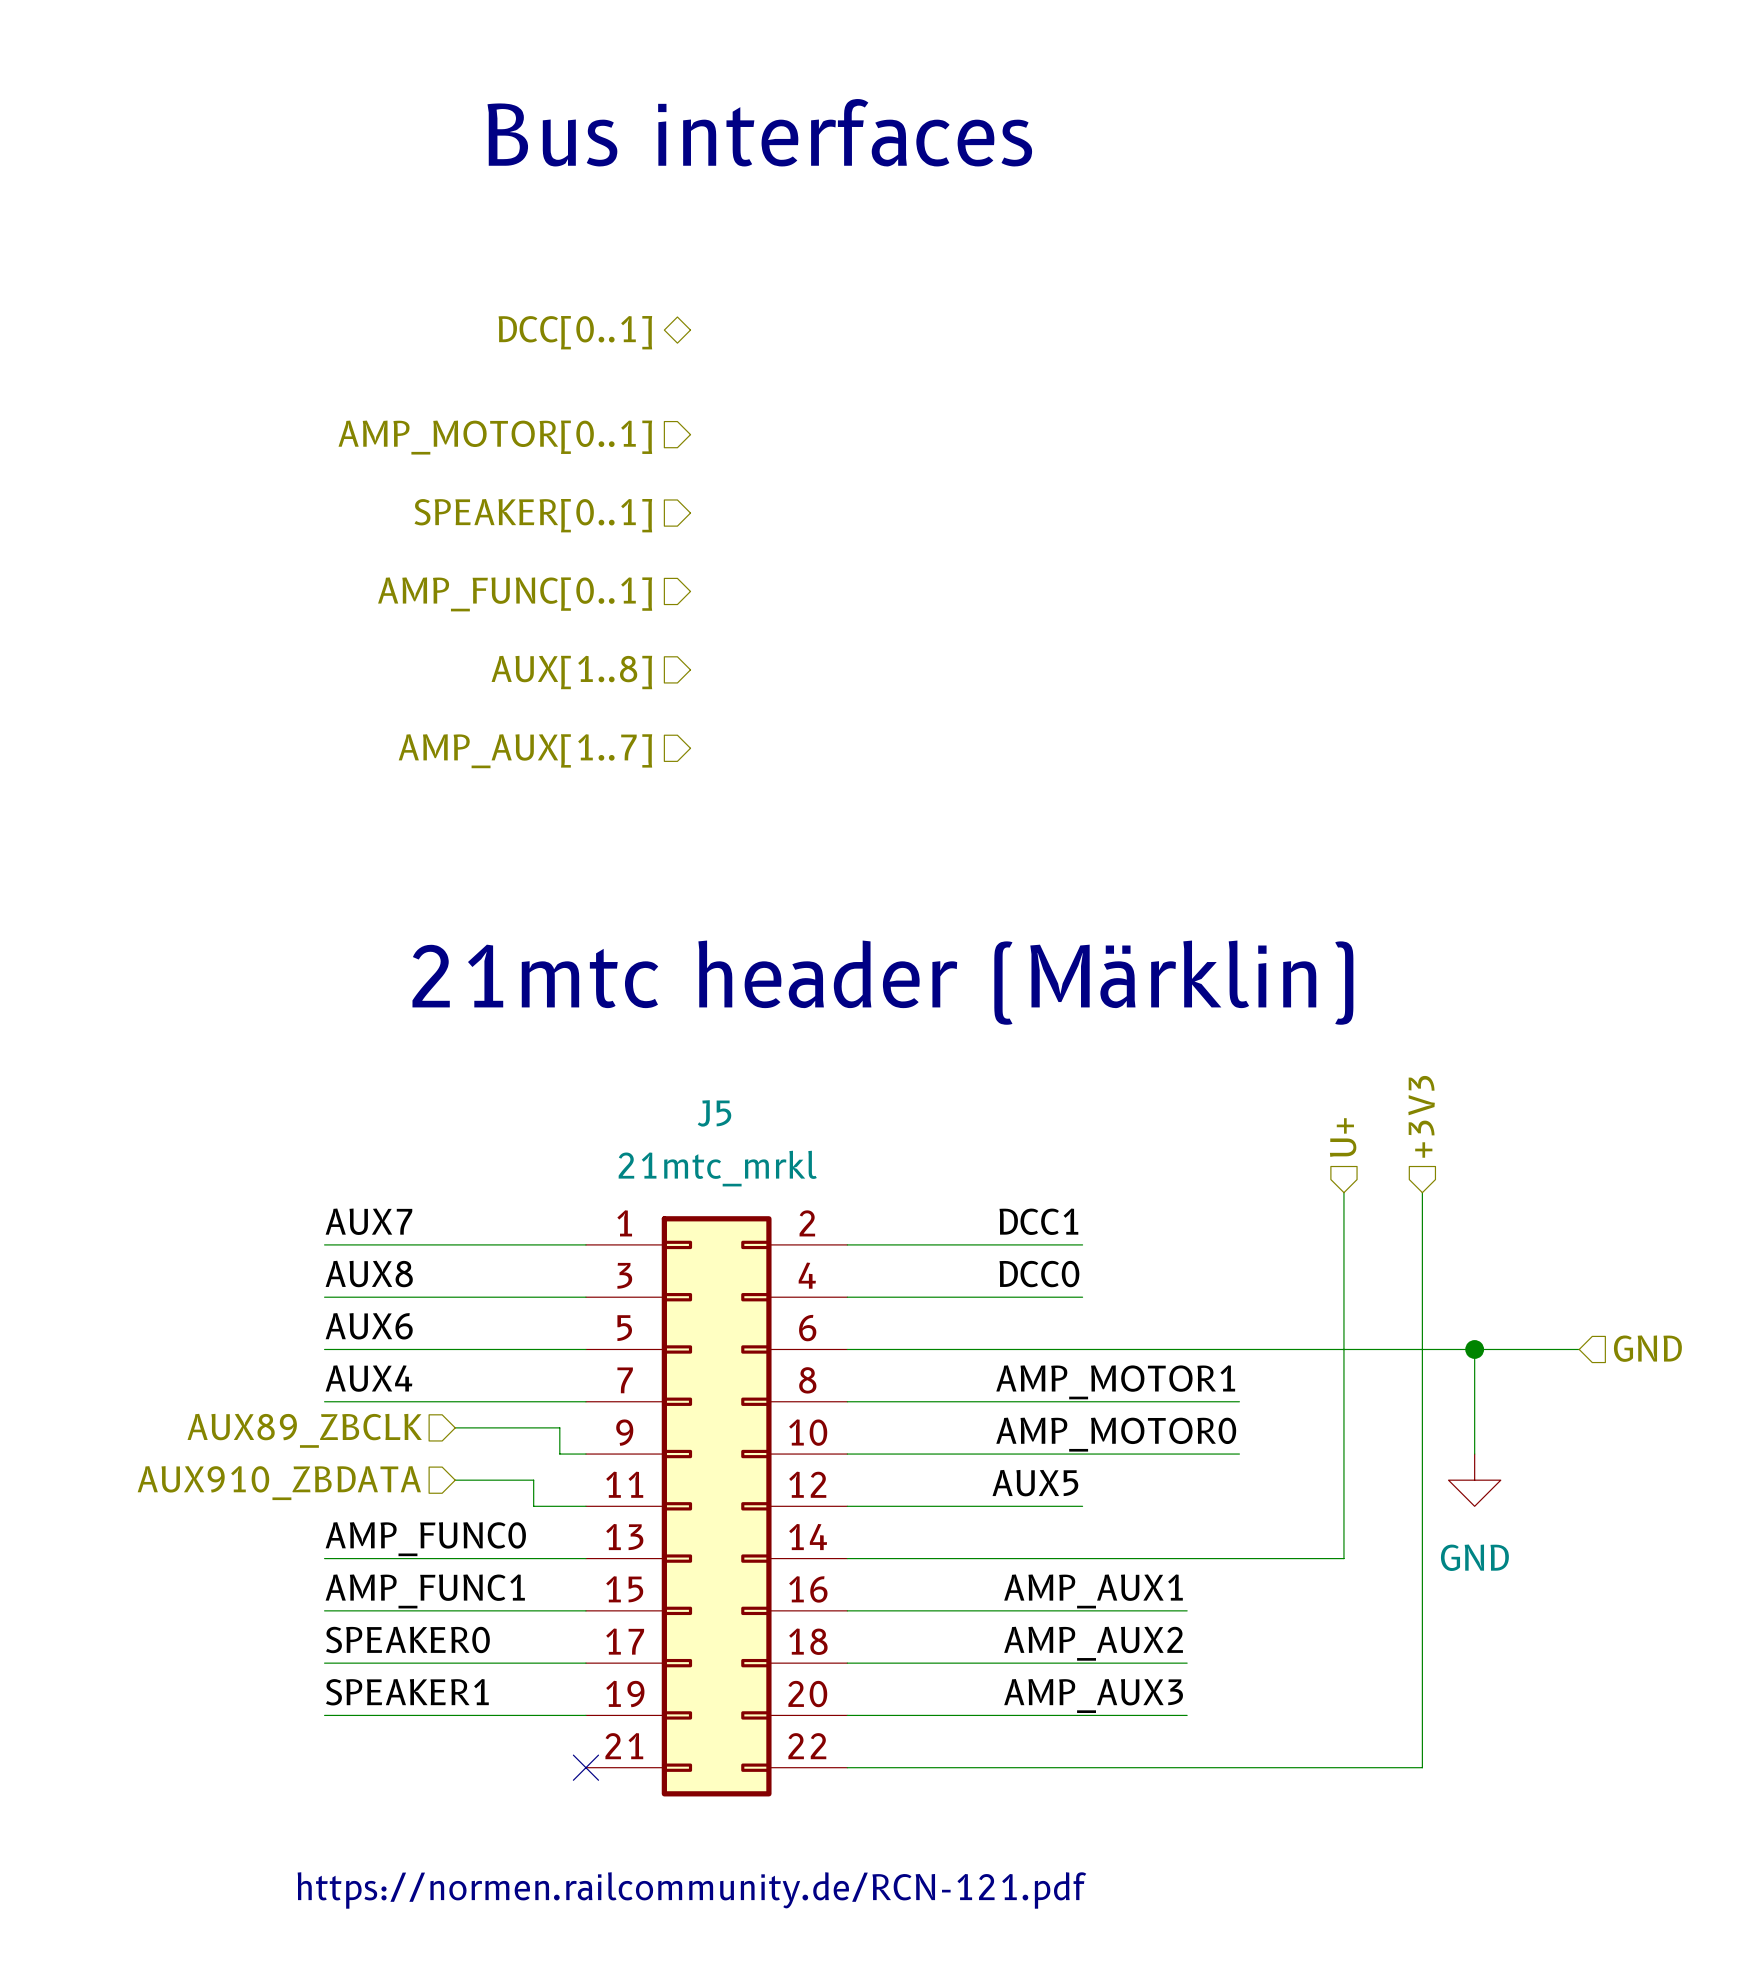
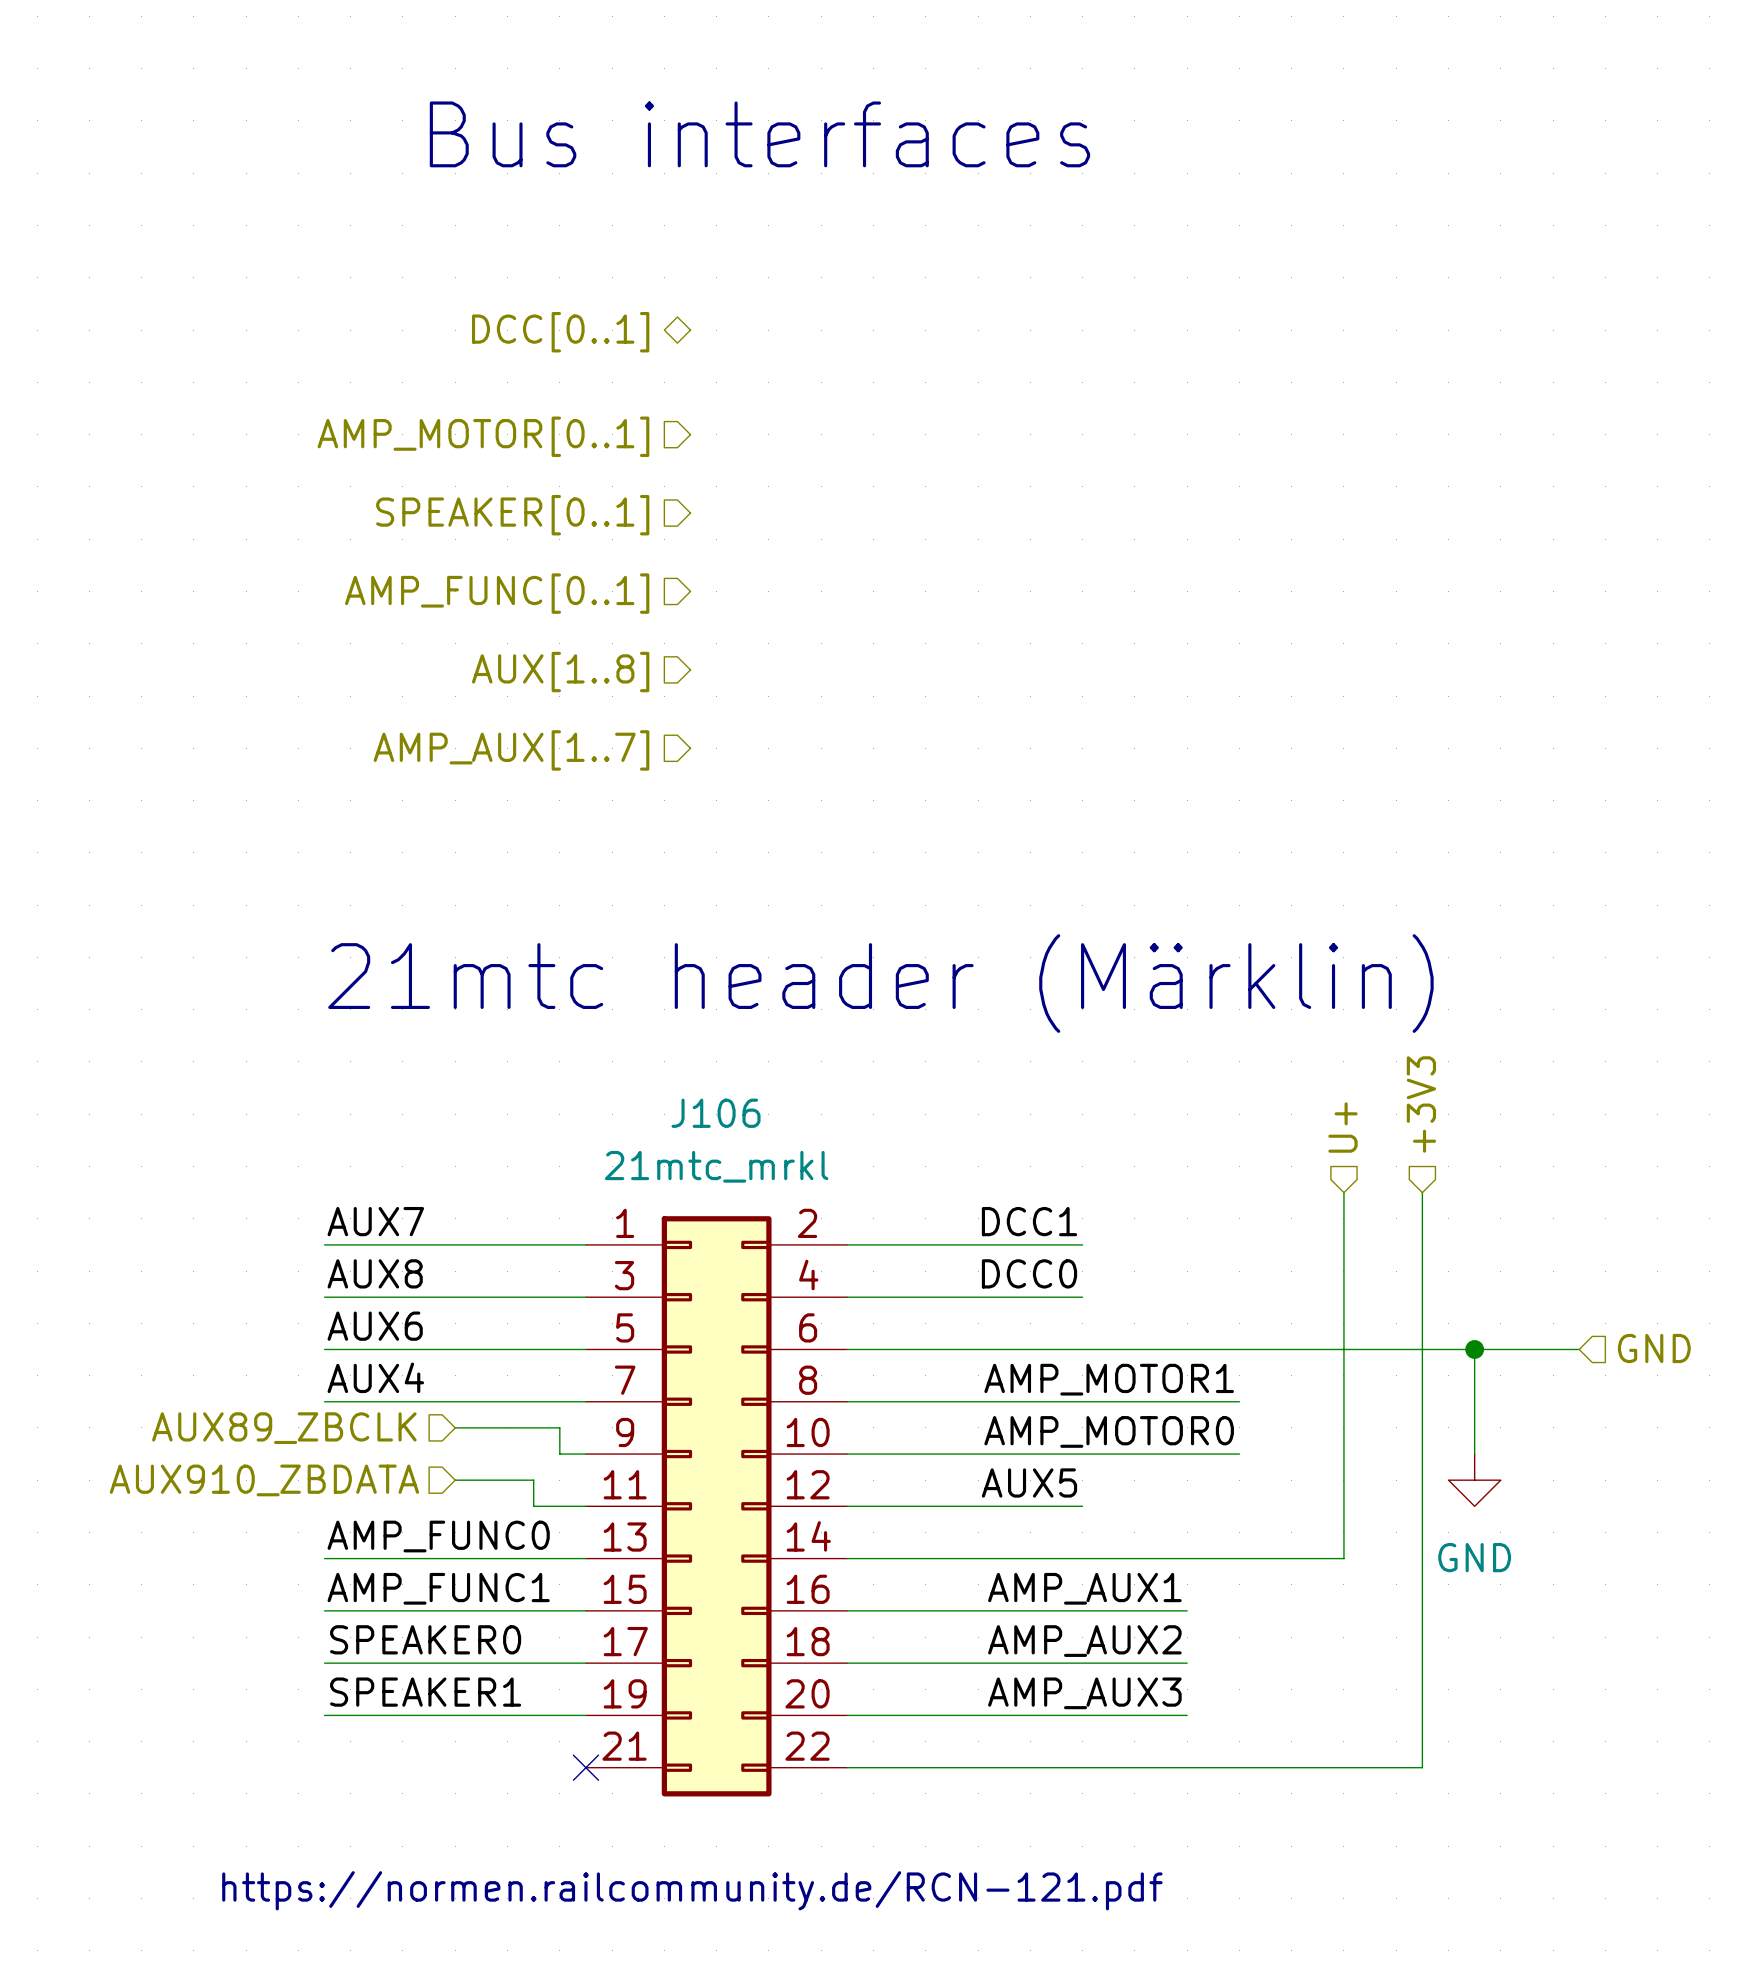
J5 name: J5 (714, 1113) -> J106 (716, 1113)

